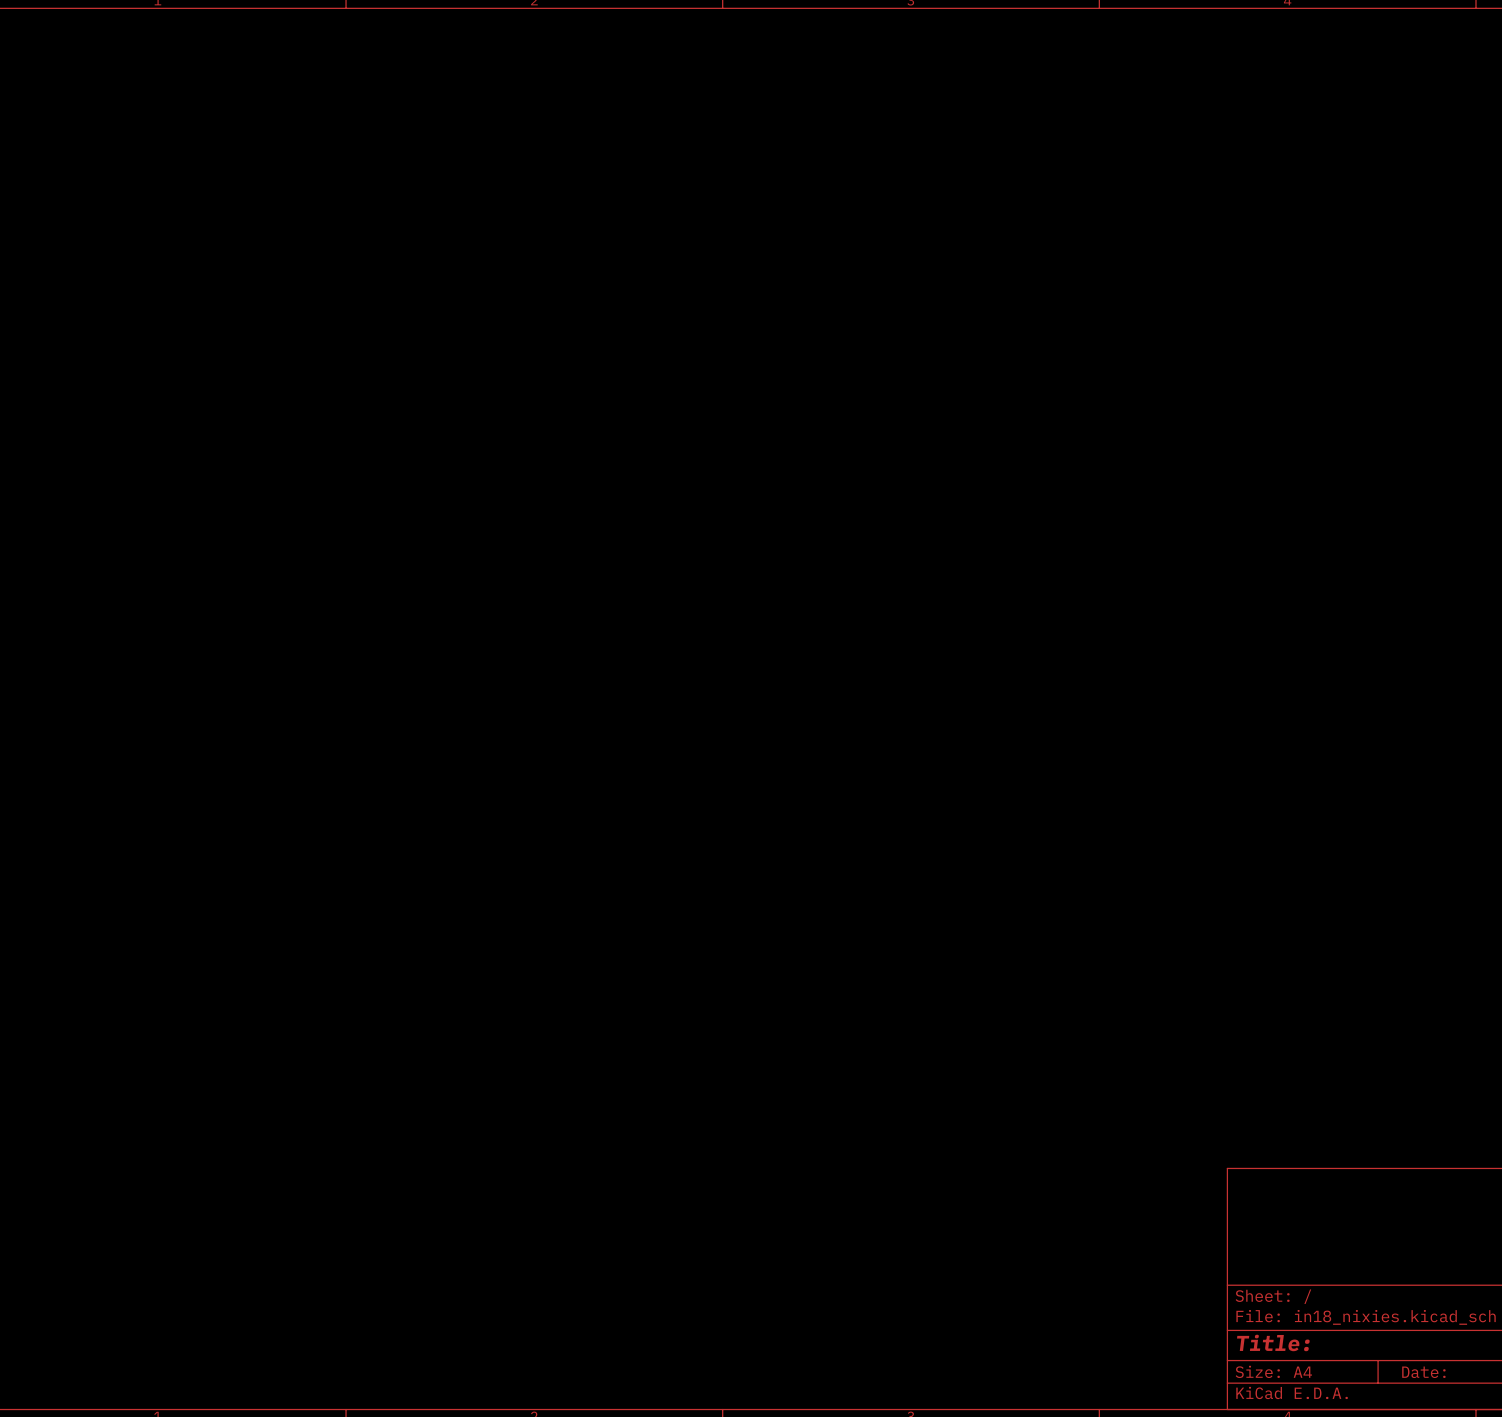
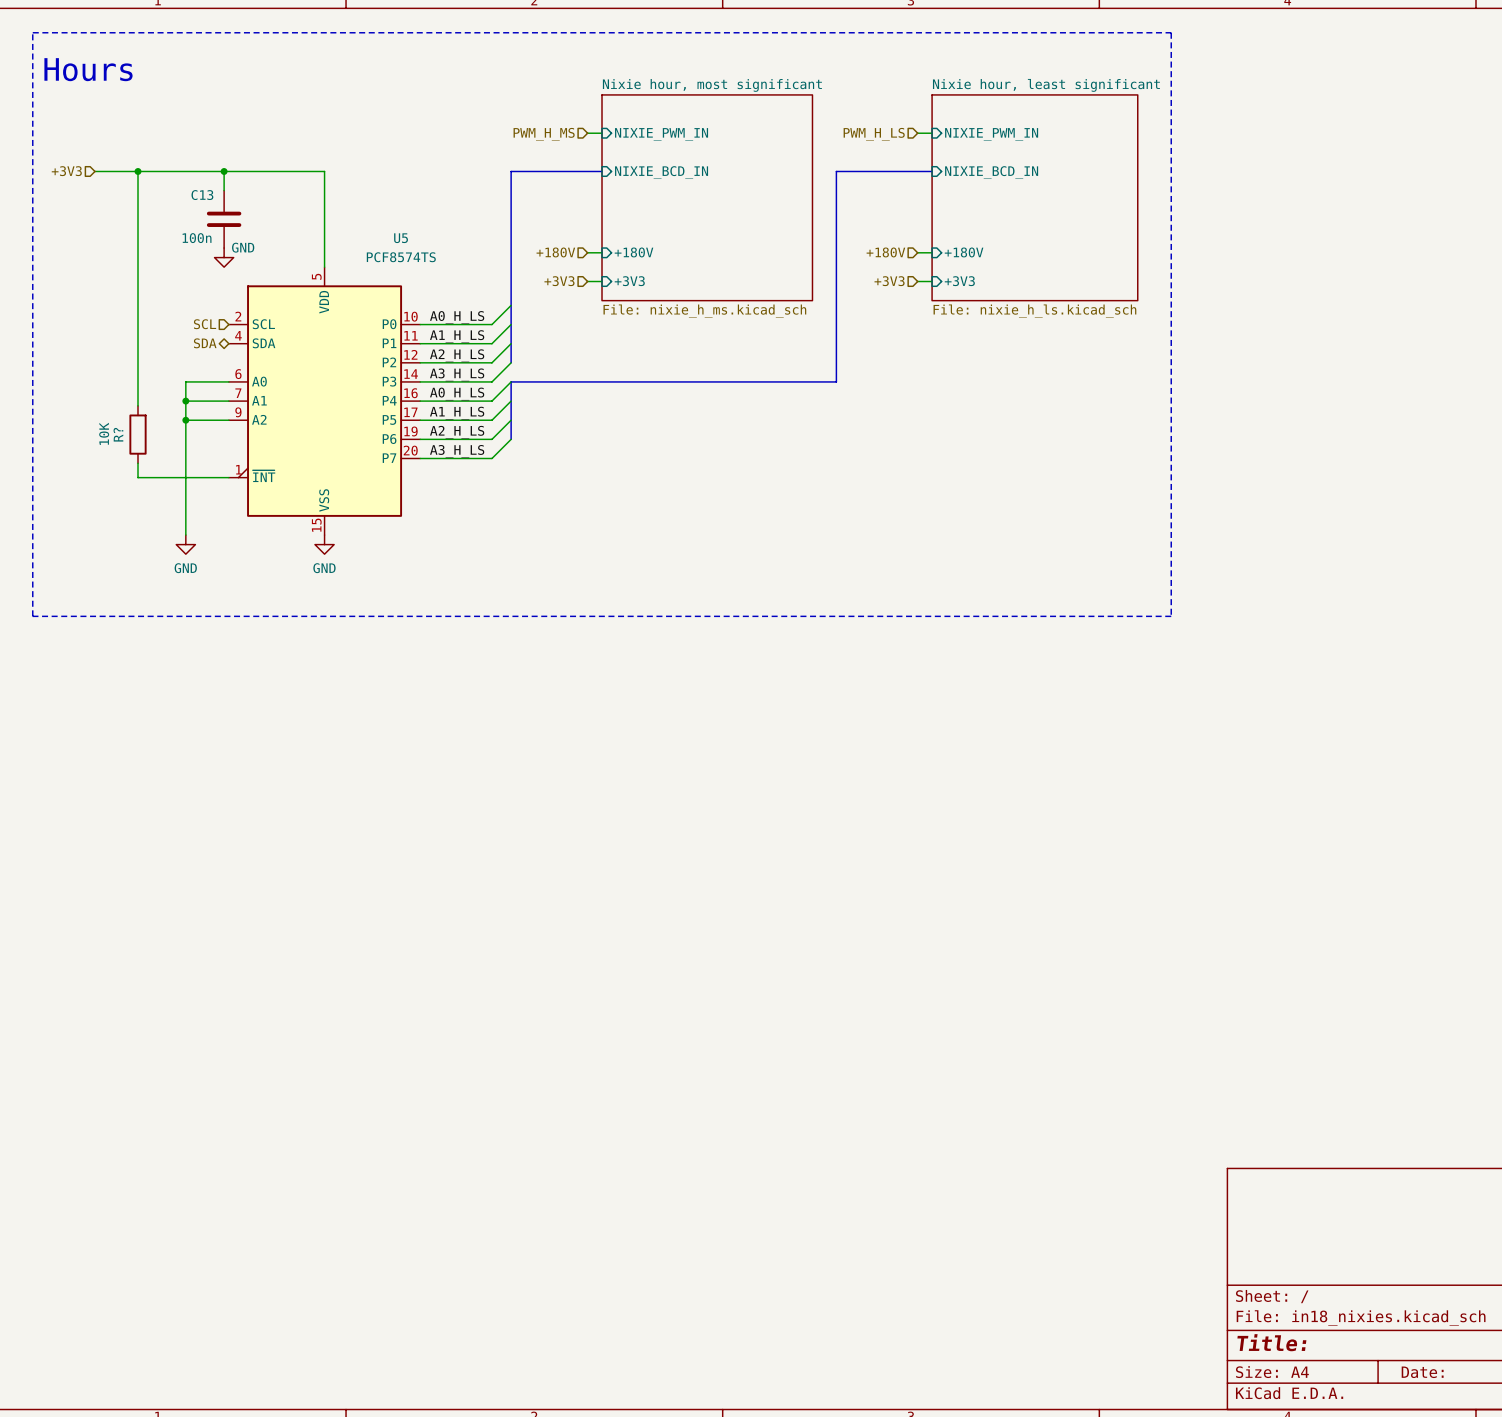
line: none -> (32, 32) (1171, 32) (1171, 616) (32, 616) (32, 32)
text: none -> Hours (88, 69)
hierarchical label: none -> PWM_H_MS (544, 134)
wire: none -> (587, 133) (602, 133)
hierarchical label: none -> PWM_H_LS (874, 134)
wire: none -> (917, 133) (932, 133)
sheet pin: none -> NIXIE_PWM_IN (661, 134)
sheet pin: none -> NIXIE_PWM_IN (991, 134)
hierarchical label: none -> +3V3 (66, 171)
wire: none -> (94, 171) (324, 171) (324, 267)
wire: none -> (138, 171) (138, 405)
junction: none -> (138, 171)
wire: none -> (224, 171) (224, 190)
junction: none -> (224, 171)
bus: none -> (602, 171) (511, 171) (511, 362)
bus: none -> (932, 171) (836, 171) (836, 381) (511, 381) (511, 439)
sheet pin: none -> NIXIE_BCD_IN (661, 172)
sheet pin: none -> NIXIE_BCD_IN (991, 172)
sheet Nixie hour, most significant: none -> File: nixie_h_ms.kicad_sch (707, 197)
sheet Nixie hour, least significant: none -> File: nixie_h_ls.kicad_sch (1034, 197)
C13: none -> 100n (224, 219)
hierarchical label: none -> +180V (555, 252)
wire: none -> (587, 252) (602, 252)
sheet pin: none -> +180V (634, 252)
hierarchical label: none -> +180V (885, 252)
wire: none -> (917, 252) (932, 252)
sheet pin: none -> +180V (964, 252)
power symbol: none -> GND (224, 257)
hierarchical label: none -> +3V3 (559, 281)
wire: none -> (587, 281) (602, 281)
sheet pin: none -> +3V3 (629, 281)
hierarchical label: none -> +3V3 (889, 281)
wire: none -> (917, 281) (932, 281)
sheet pin: none -> +3V3 (959, 281)
wire: none -> (511, 305) (491, 324) (420, 324)
label: none -> A0_H_LS (457, 317)
hierarchical label: none -> SCL (205, 324)
wire: none -> (511, 324) (491, 343) (420, 343)
label: none -> A1_H_LS (457, 336)
hierarchical label: none -> SDA (205, 343)
wire: none -> (511, 343) (491, 362) (420, 362)
label: none -> A2_H_LS (457, 355)
wire: none -> (511, 362) (491, 381) (420, 381)
label: none -> A3_H_LS (457, 374)
wire: none -> (228, 381) (185, 381) (185, 535)
wire: none -> (511, 381) (491, 401) (420, 401)
label: none -> A0_H_LS (457, 394)
wire: none -> (185, 401) (228, 401)
junction: none -> (185, 401)
U5: none -> PCF8574TS (324, 401)
wire: none -> (511, 401) (491, 420) (420, 420)
label: none -> A1_H_LS (457, 413)
wire: none -> (185, 420) (228, 420)
junction: none -> (185, 420)
wire: none -> (511, 420) (491, 439) (420, 439)
label: none -> A2_H_LS (457, 432)
R?: none -> 10K (138, 434)
wire: none -> (511, 439) (491, 458) (420, 458)
label: none -> A3_H_LS (457, 451)
wire: none -> (138, 463) (138, 477) (228, 477)
power symbol: none -> GND (185, 544)
power symbol: none -> GND (324, 544)

